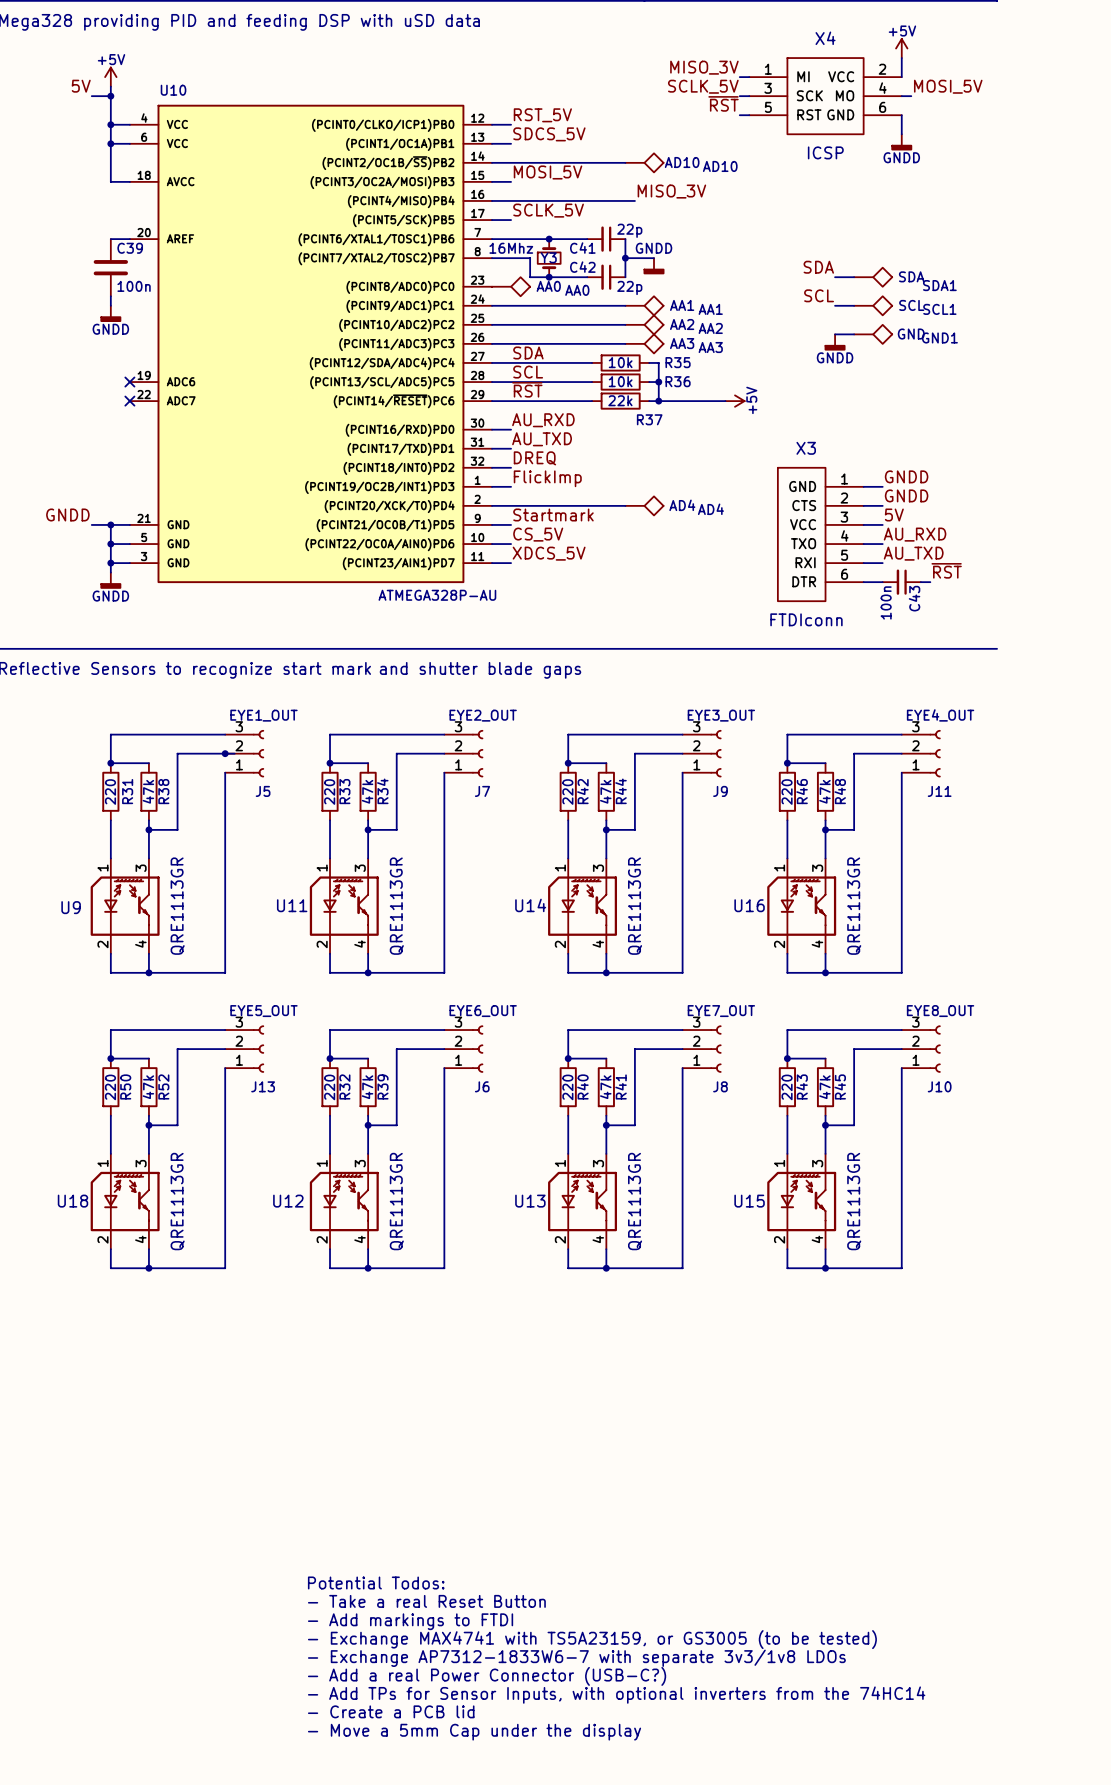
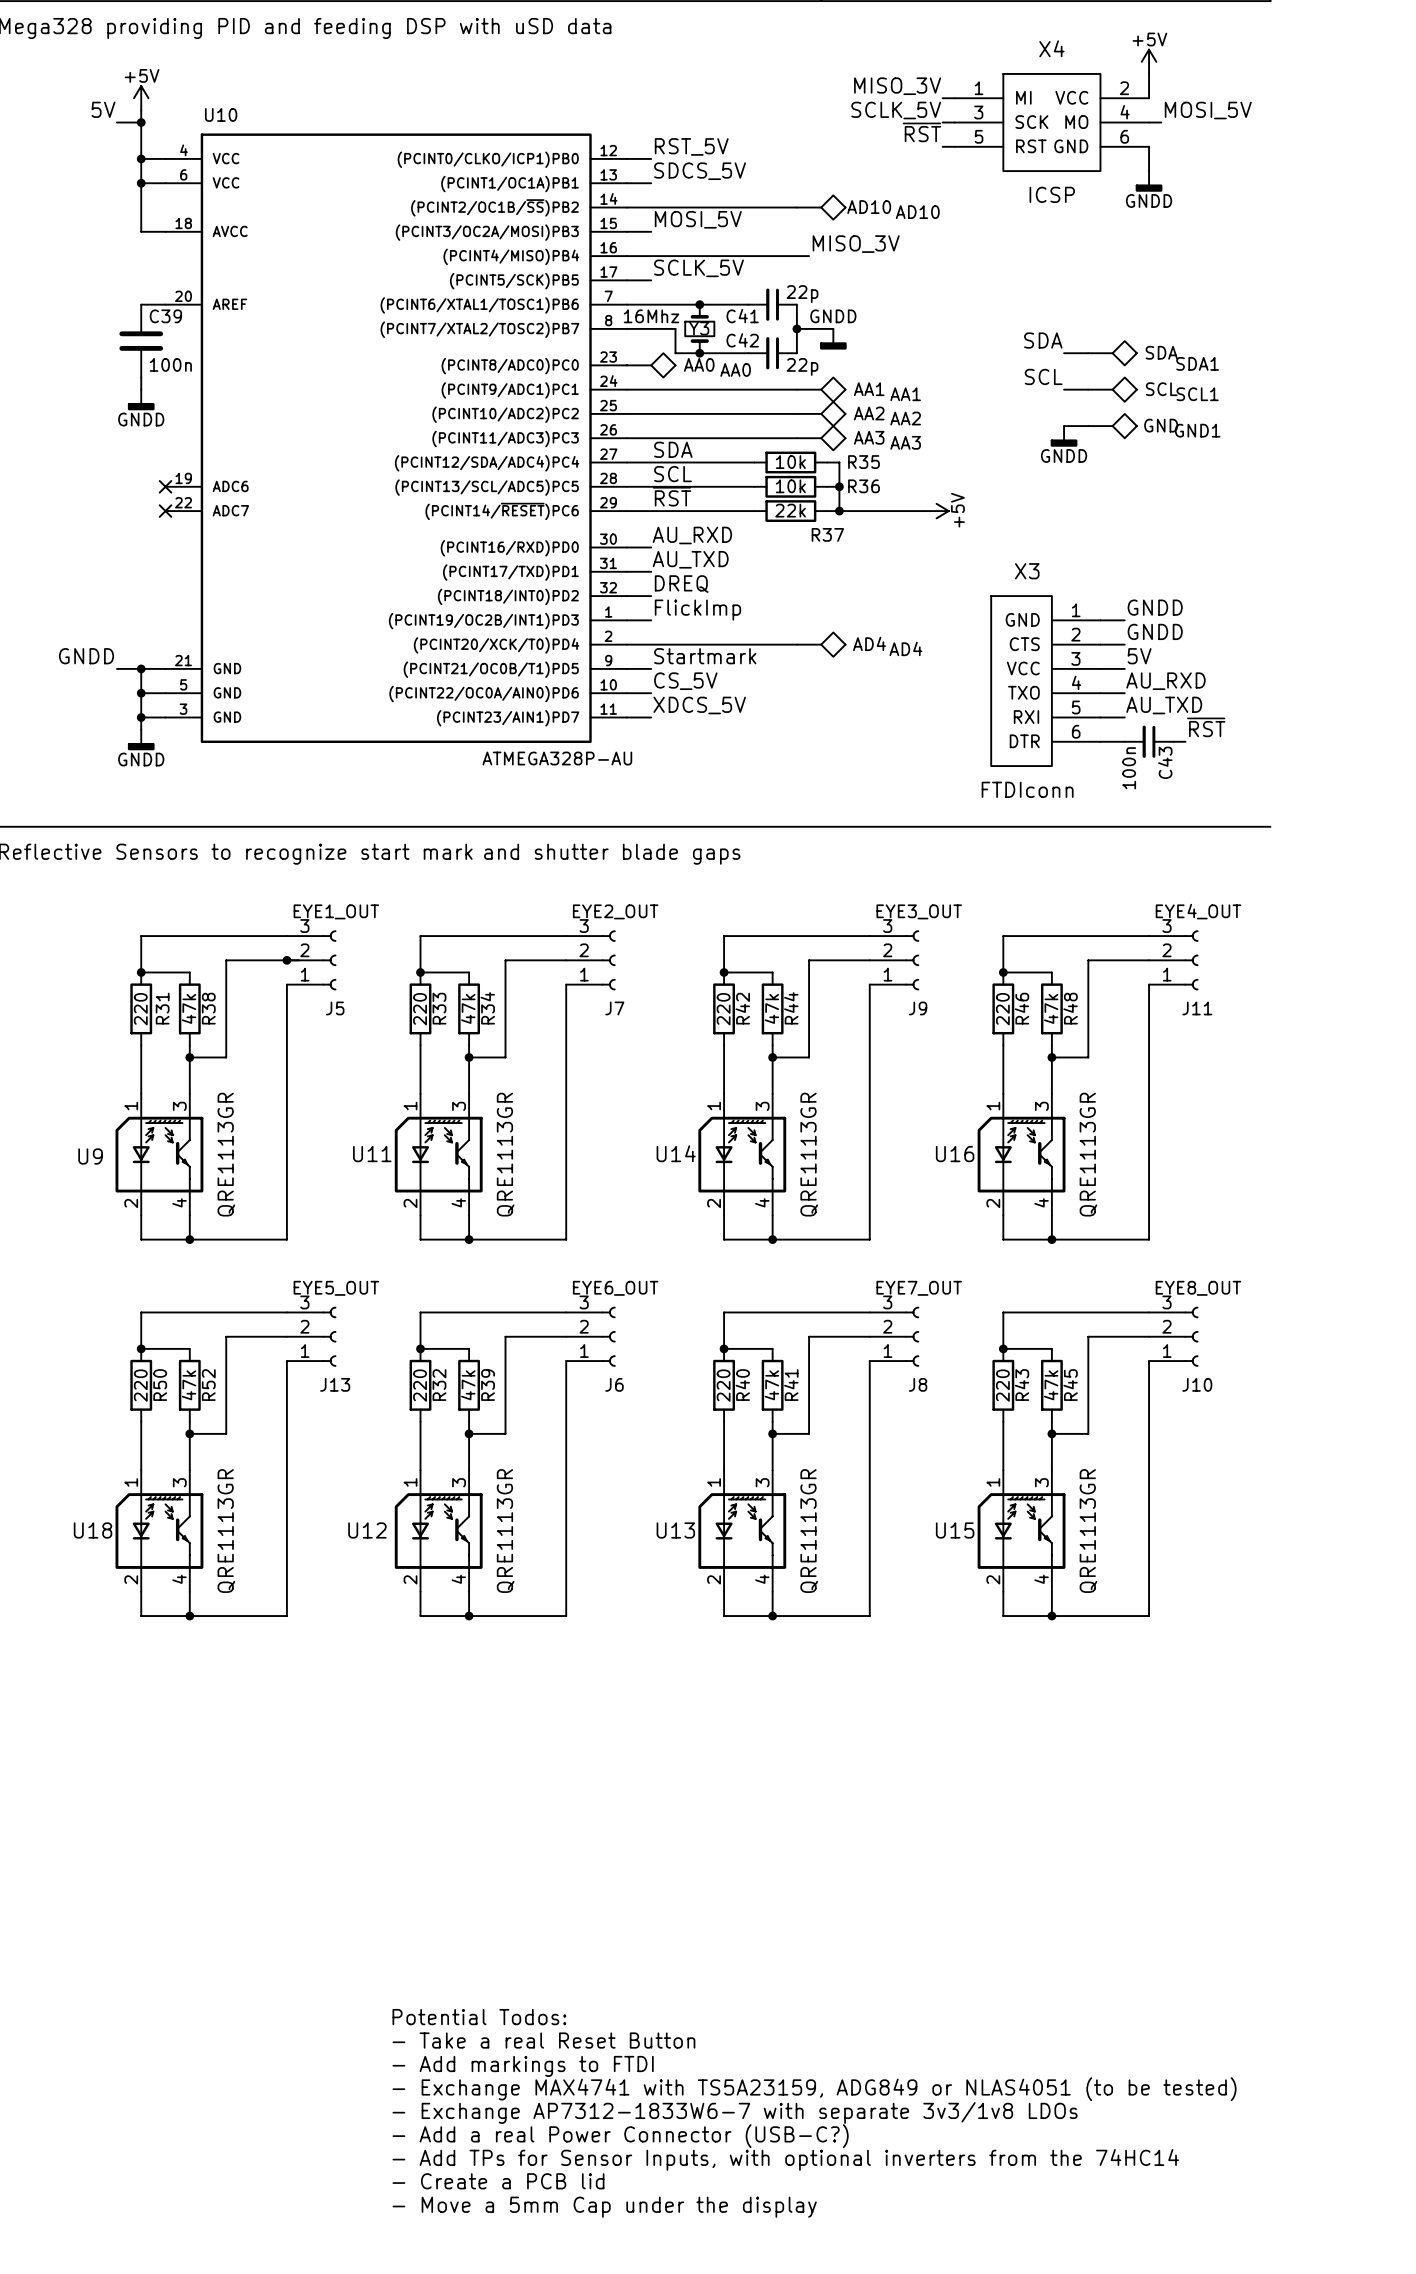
text: - Exchange MAX4741 with TS5A23159, or GS3005 (to be tested) (592, 1639) -> - Exchange MAX4741 with TS5A23159, ADG849 or NLAS4051 (to be tested) (814, 2089)

